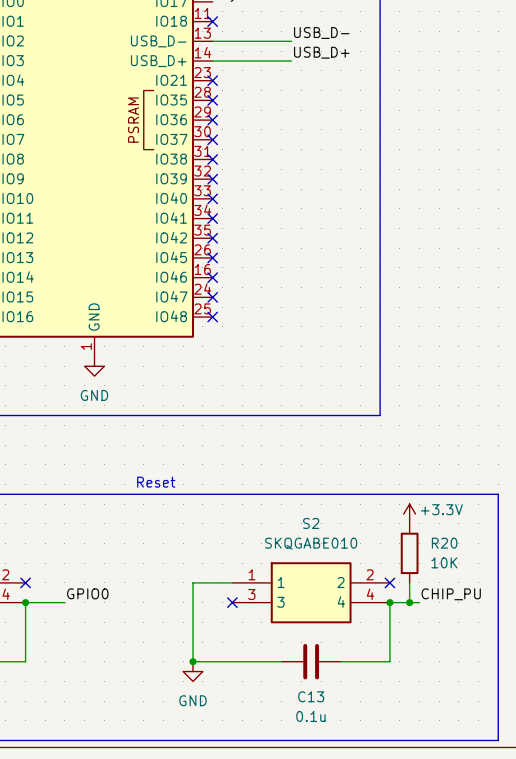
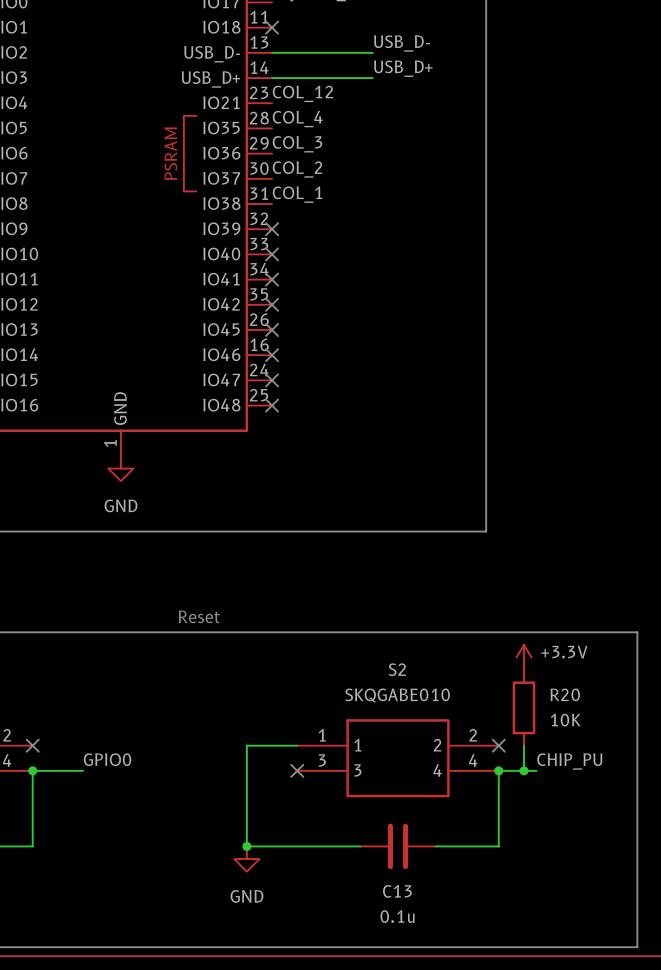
label: none -> COL_12 (302, 93)
no-connect mark: (212, 80) -> none
label: none -> COL_4 (297, 119)
no-connect mark: (212, 100) -> none
label: none -> COL_3 (297, 144)
no-connect mark: (212, 120) -> none
label: none -> COL_2 (297, 169)
no-connect mark: (212, 139) -> none
label: none -> COL_1 (297, 194)
no-connect mark: (212, 159) -> none

